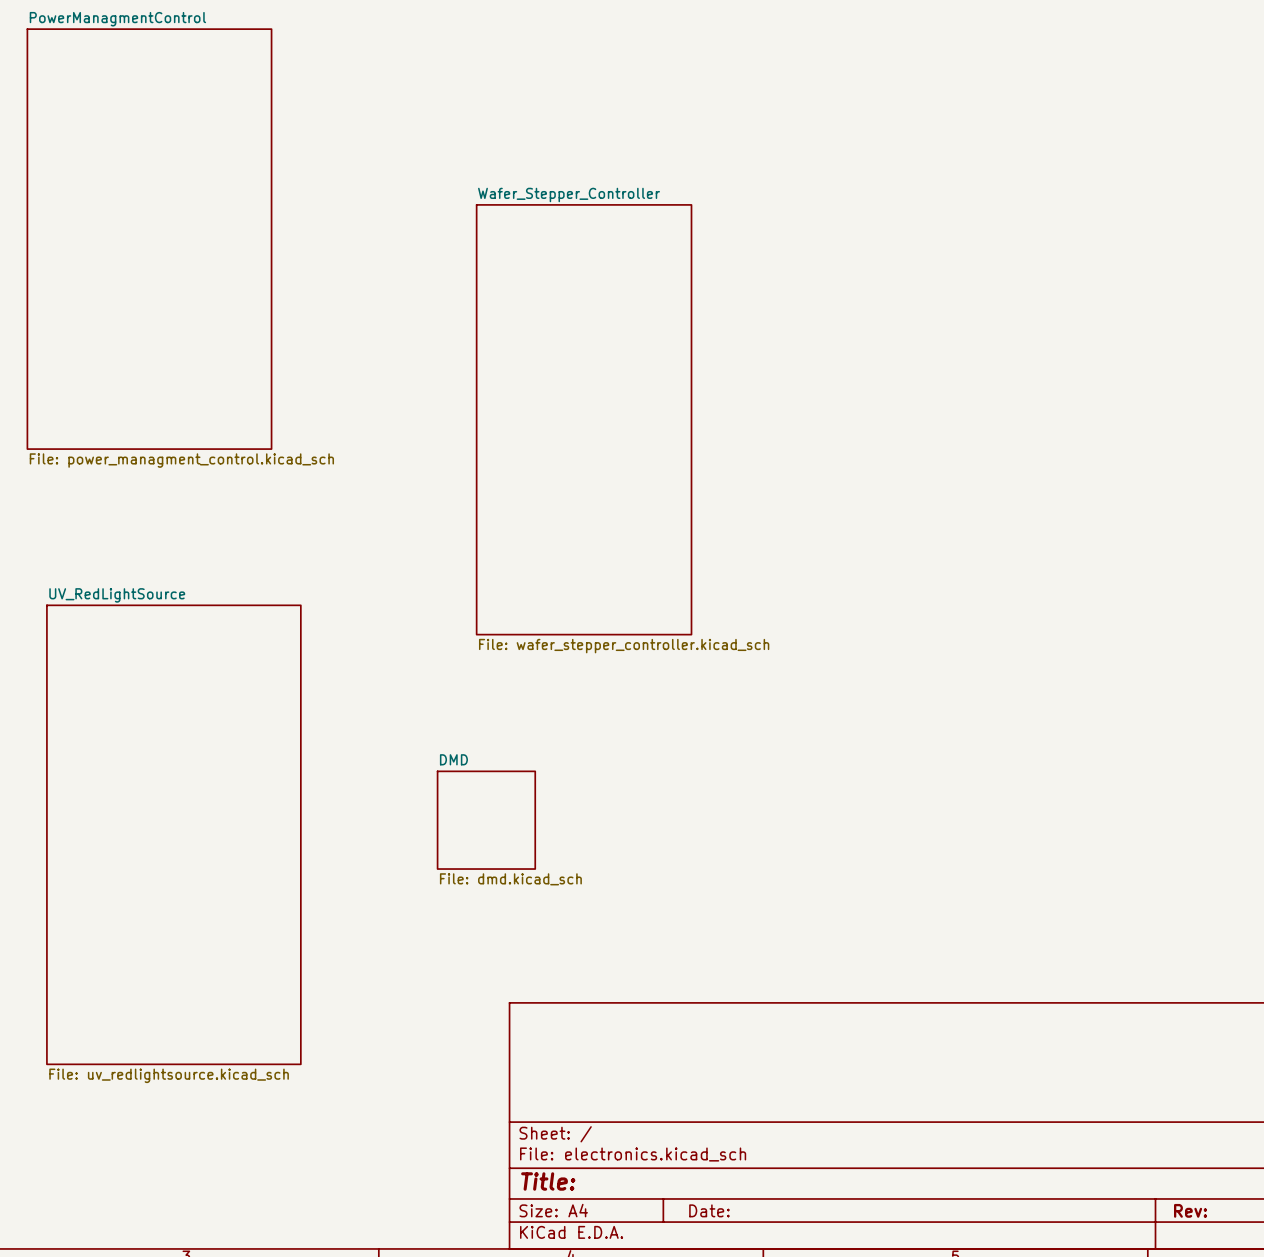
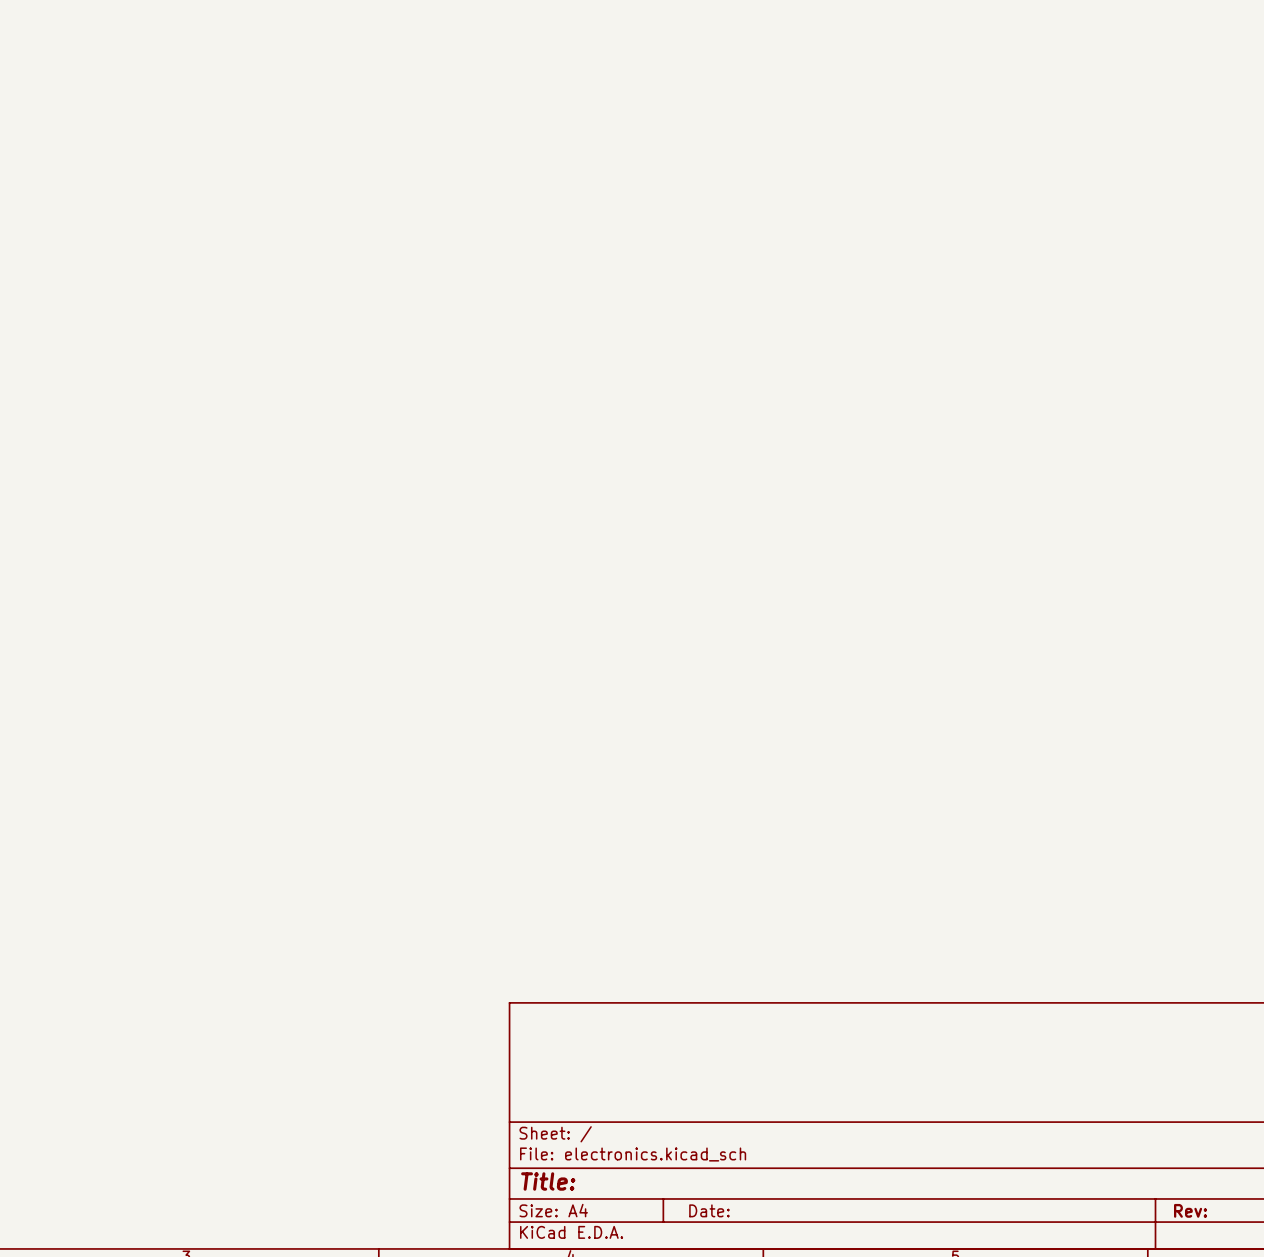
sheet PowerManagmentControl: File: power_managment_control.kicad_sch (149, 239) -> none
sheet Wafer_Stepper_Controller: File: wafer_stepper_controller.kicad_sch (584, 419) -> none
sheet DMD: File: dmd.kicad_sch (486, 820) -> none
sheet UV_RedLightSource: File: uv_redlightsource.kicad_sch (173, 834) -> none

